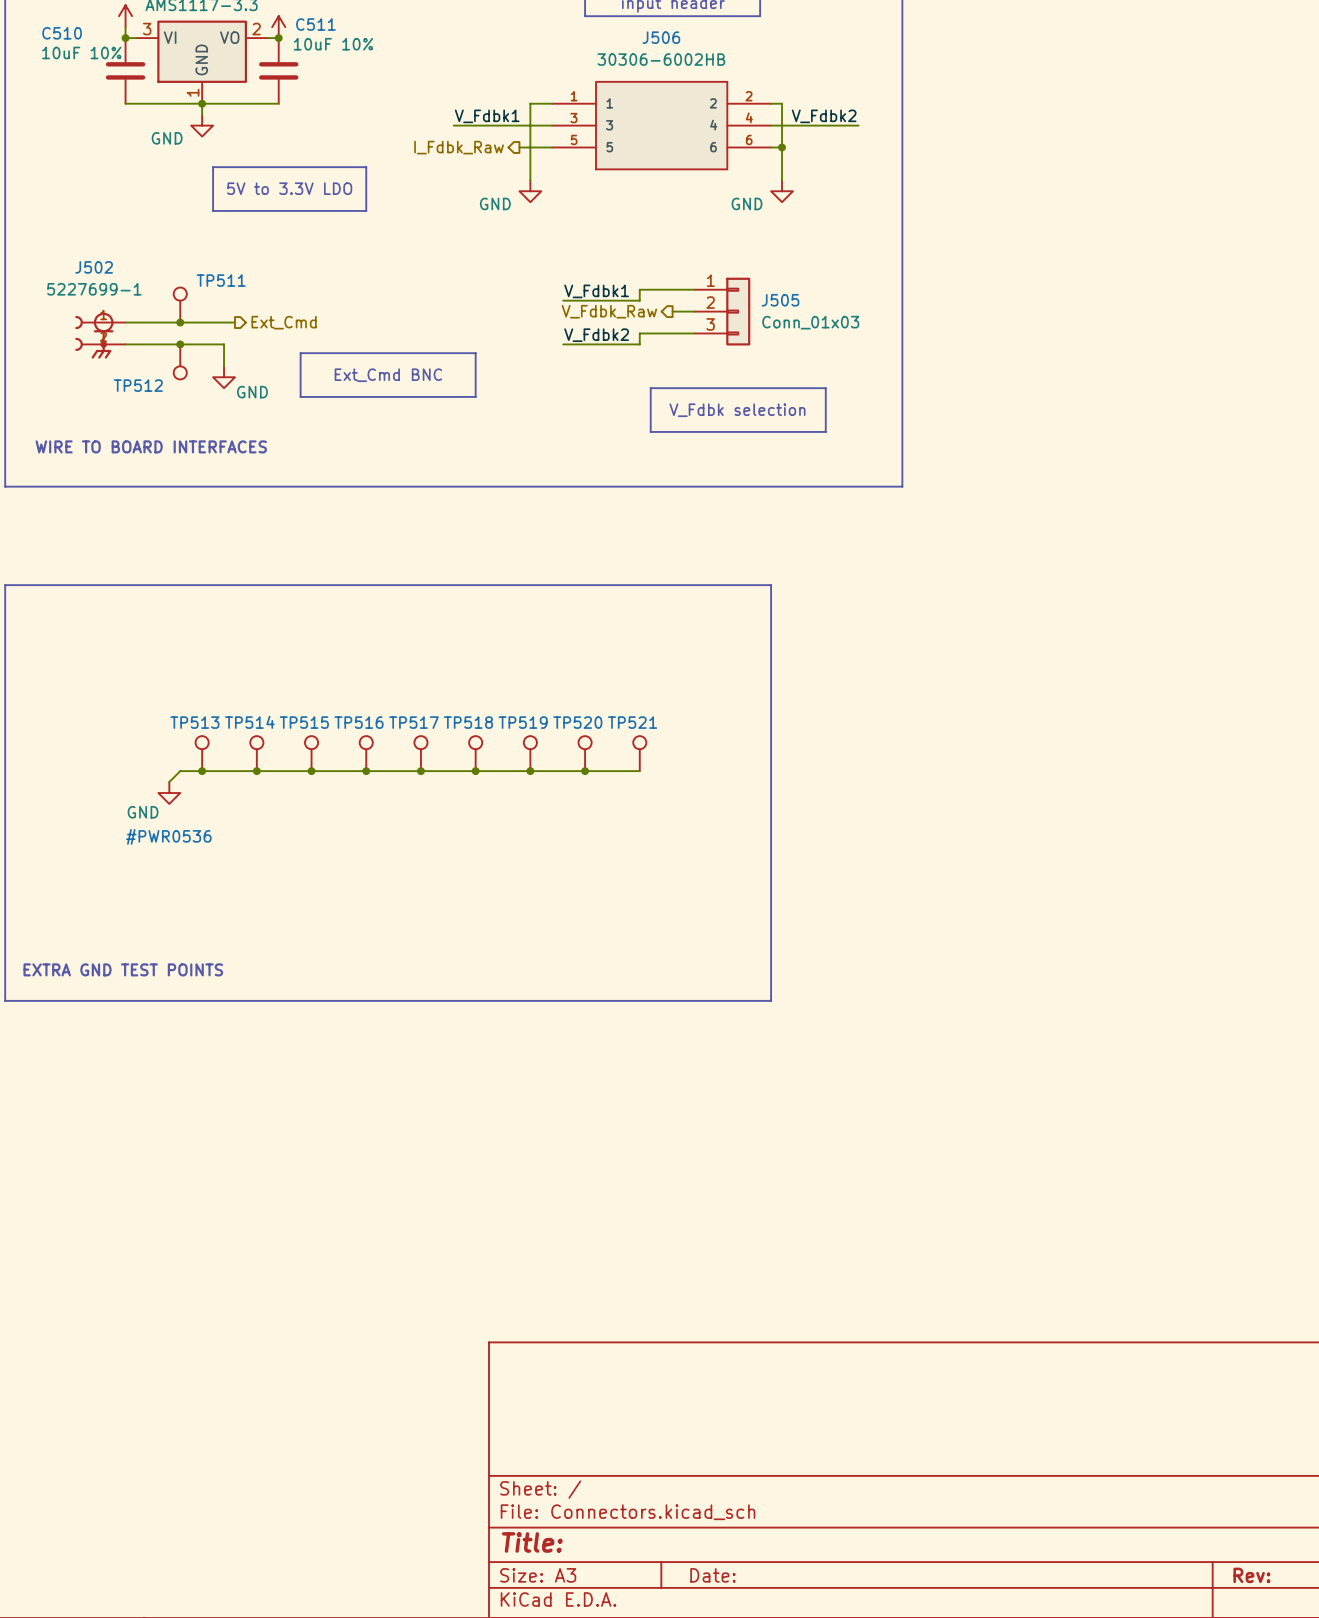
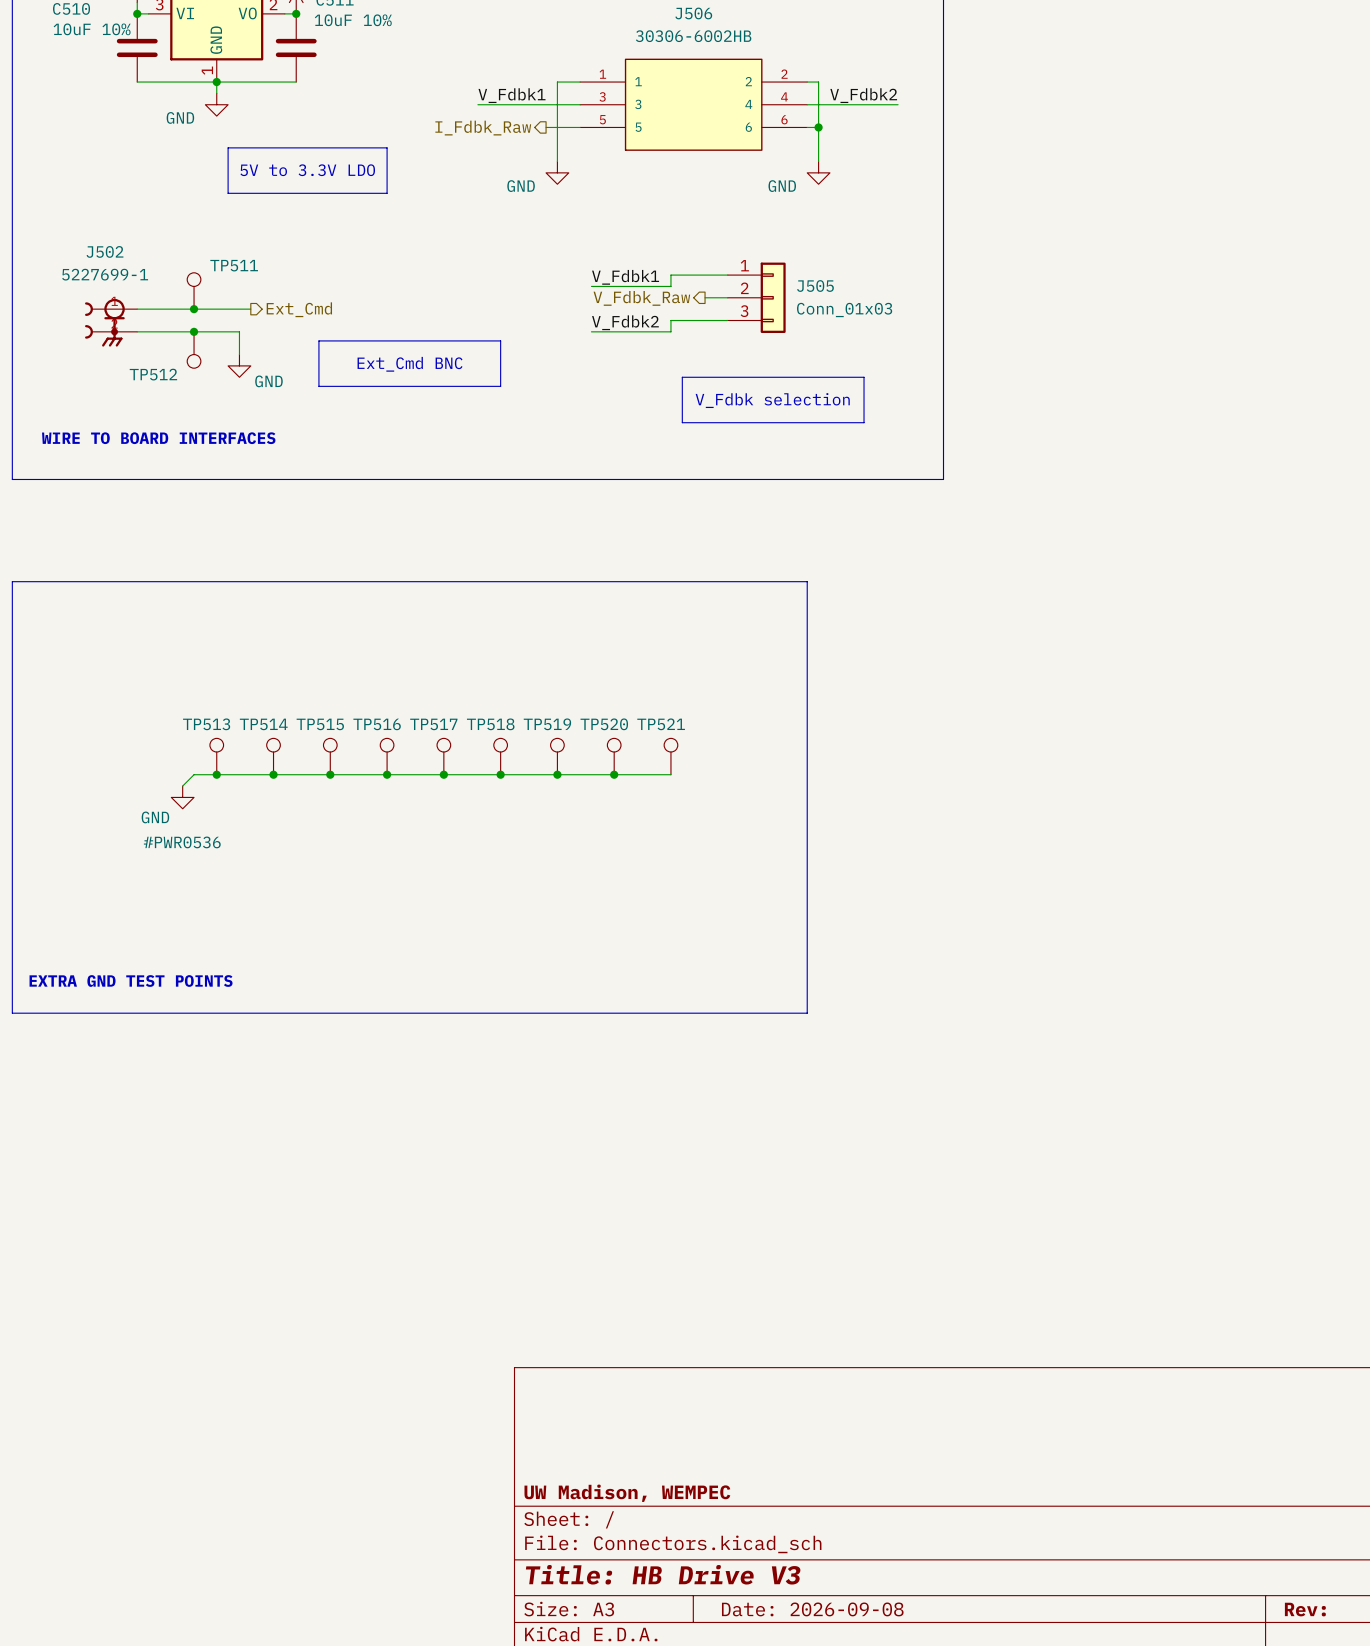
title block: none -> UW Madison, WEMPEC (627, 1493)
title block: Title: (532, 1542) -> Title: HB Drive V3 (663, 1574)
title block: Date: (712, 1575) -> Date: 2026-09-08 (812, 1609)

